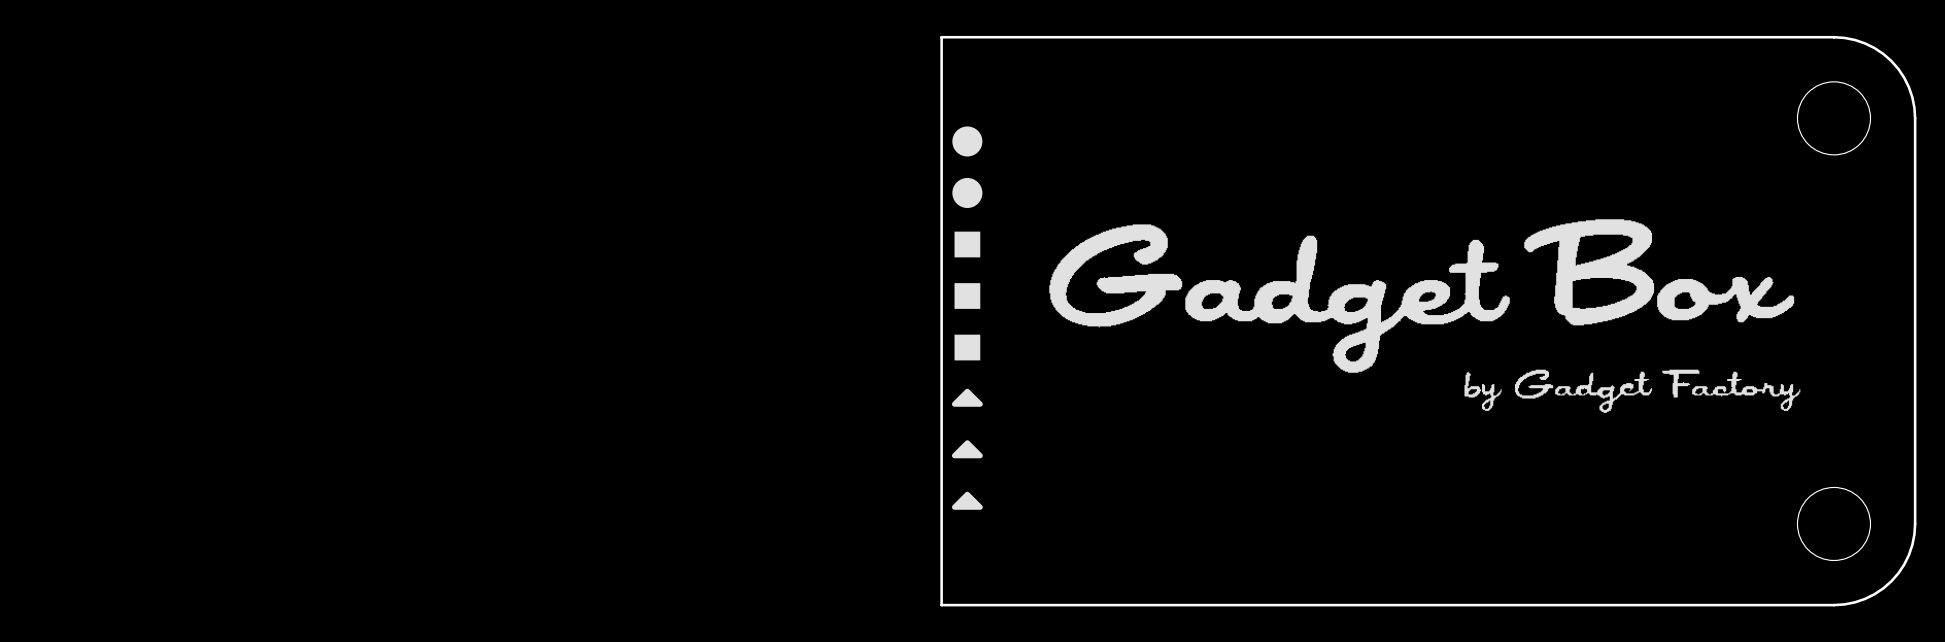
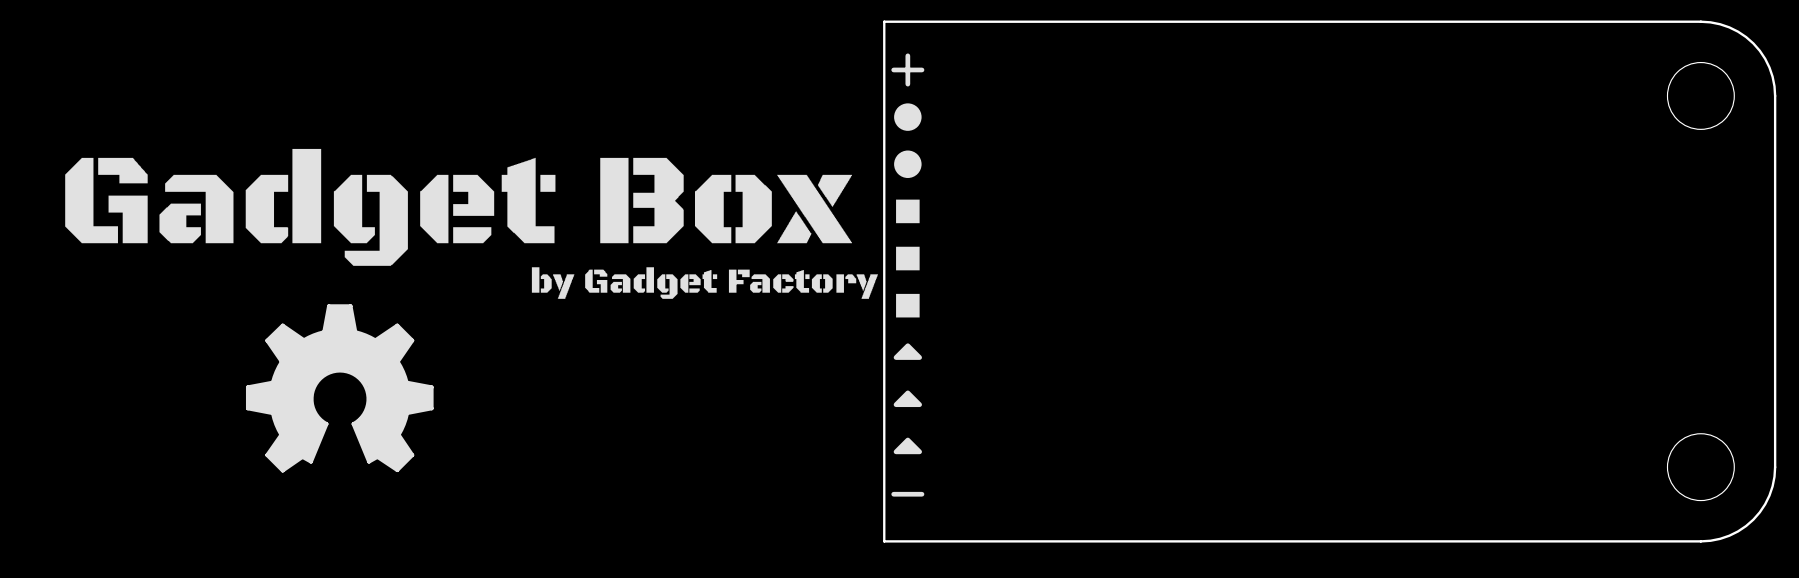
line: none -> (907, 55) (907, 84)
line: none -> (893, 69) (921, 69)
drawing: none -> [65, 148, 878, 473]
drawing: [1049, 219, 1801, 413] -> none
line: none -> (893, 494) (921, 494)

